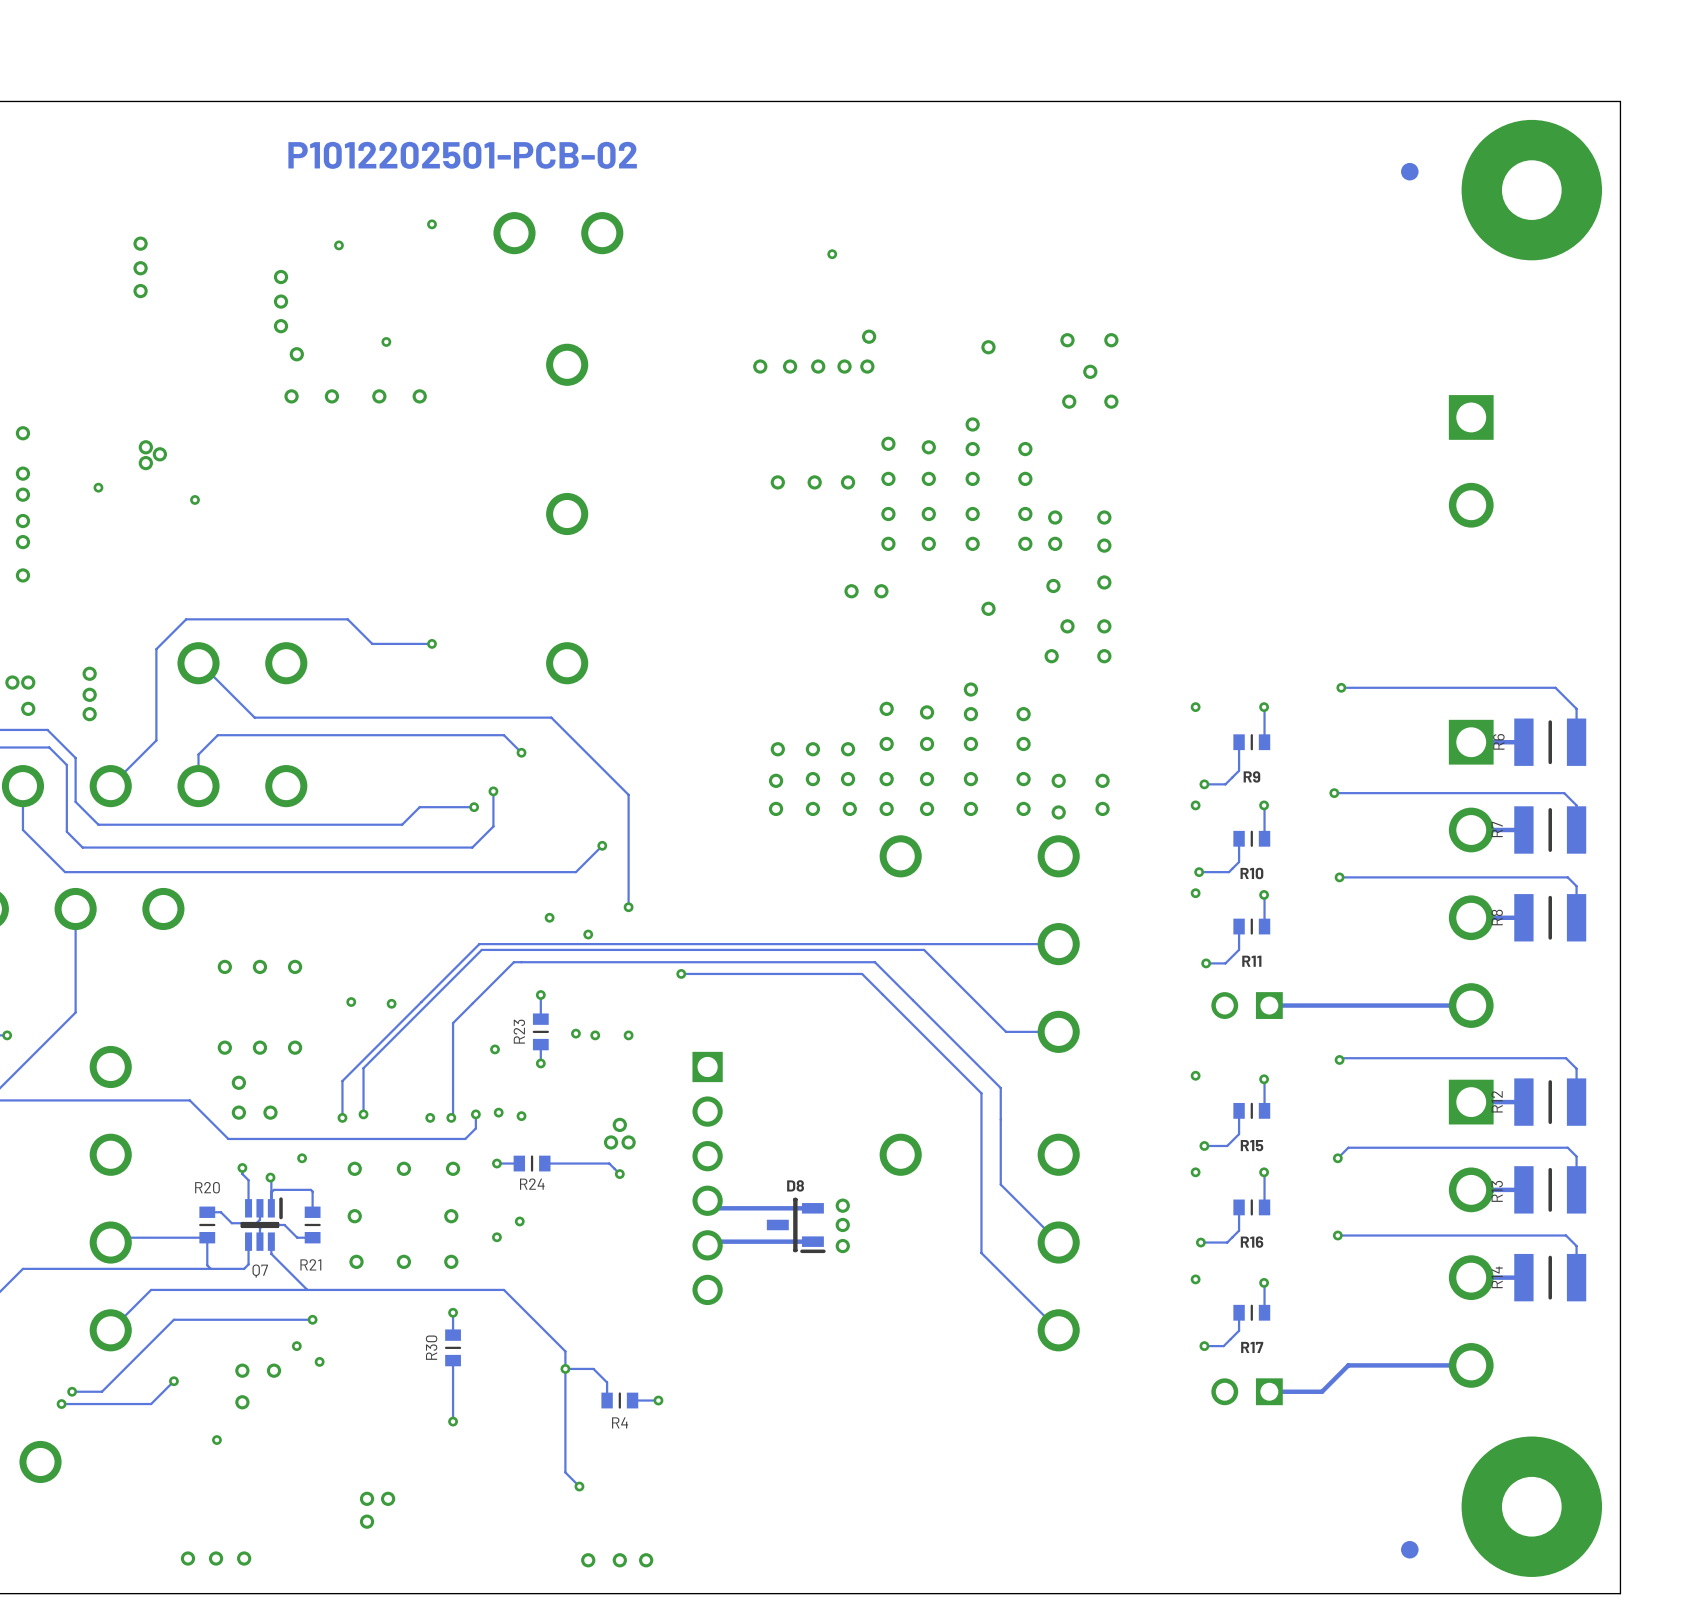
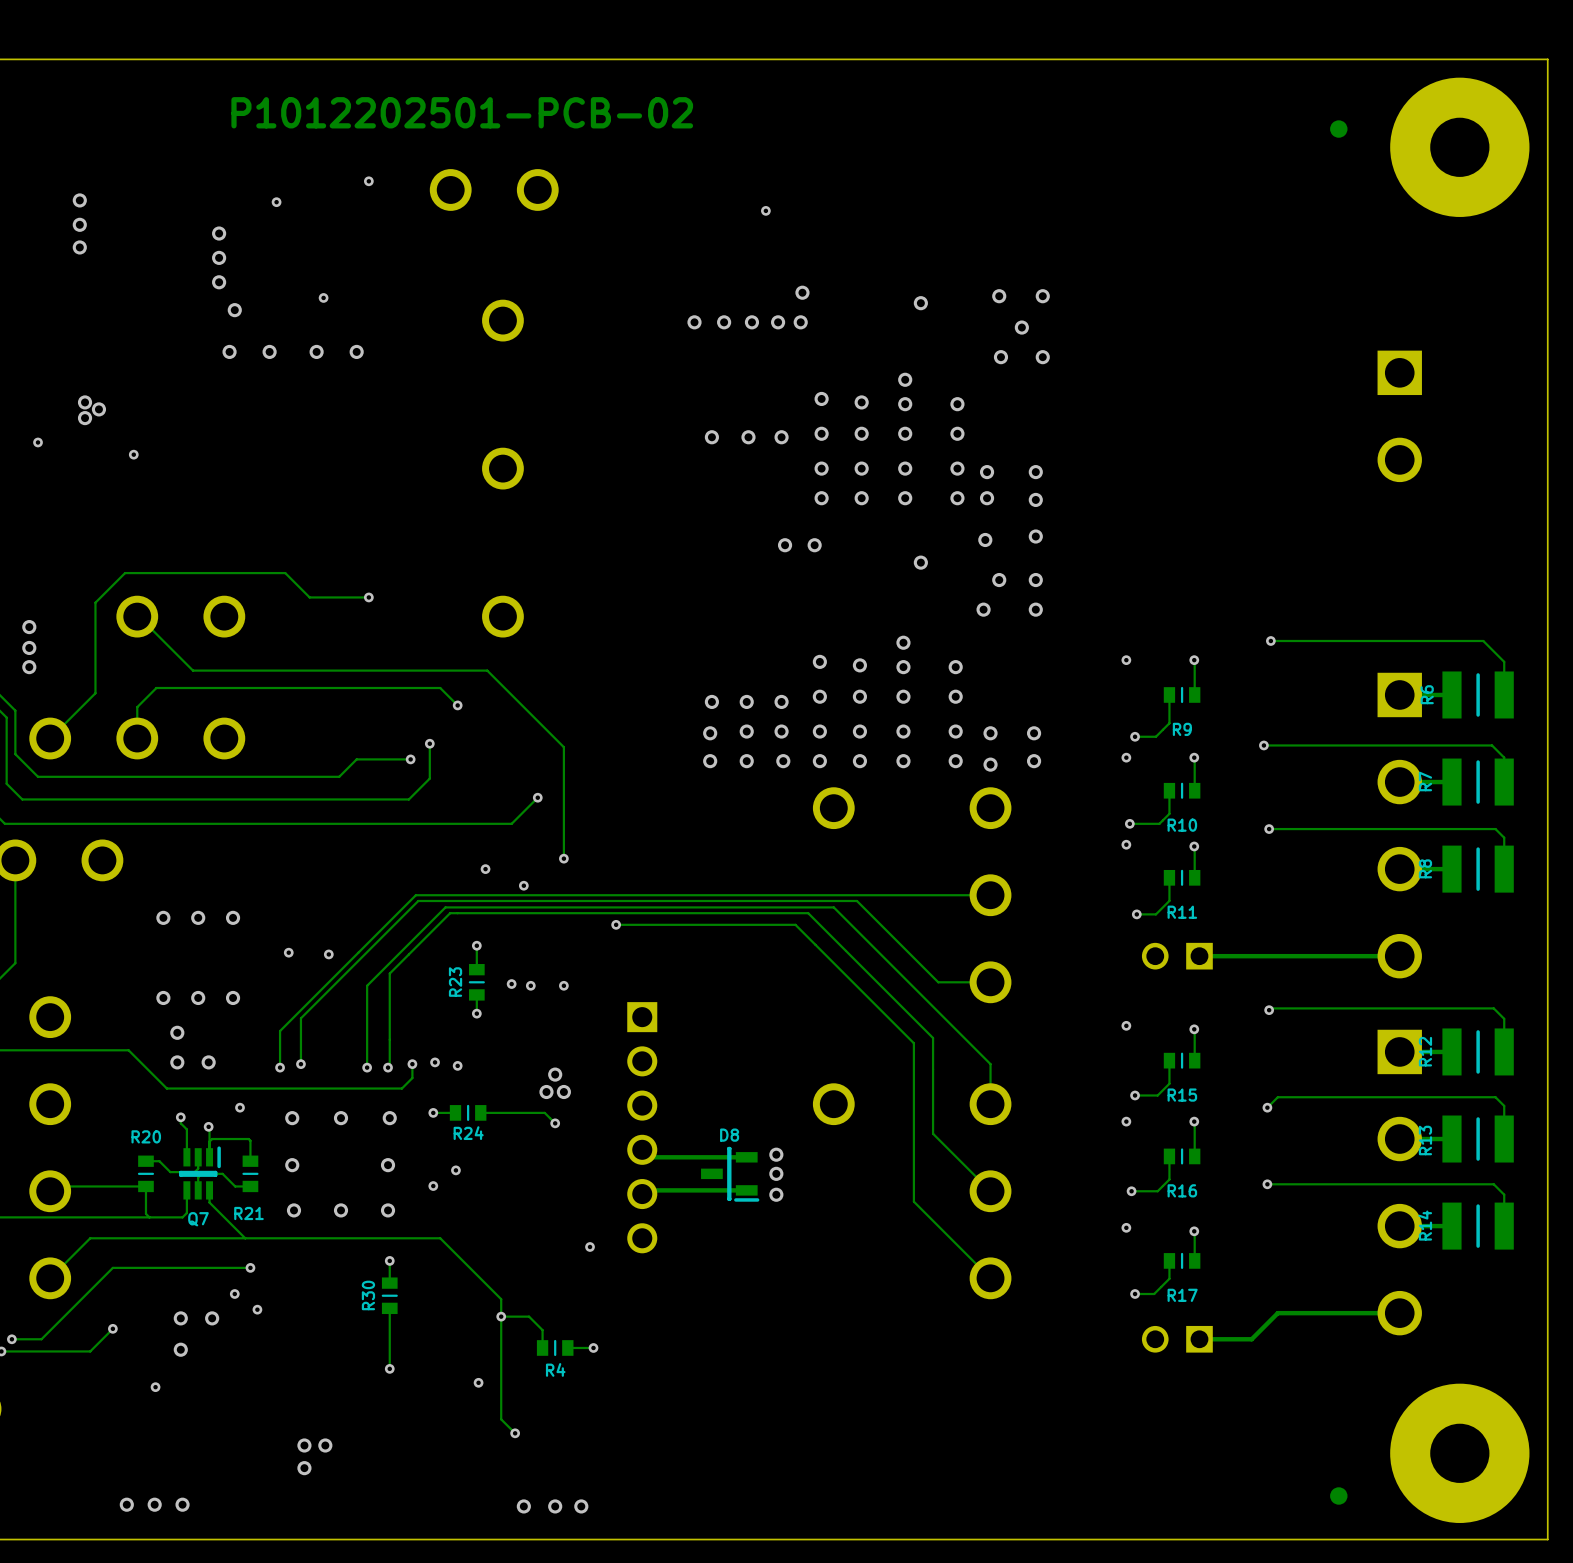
via: (495, 1049) -> none
track: none -> (367, 1067) (367, 985) (445, 907) (833, 907) (990, 1064) (990, 1104)
via: none -> (590, 1246)
via: none -> (478, 1382)

